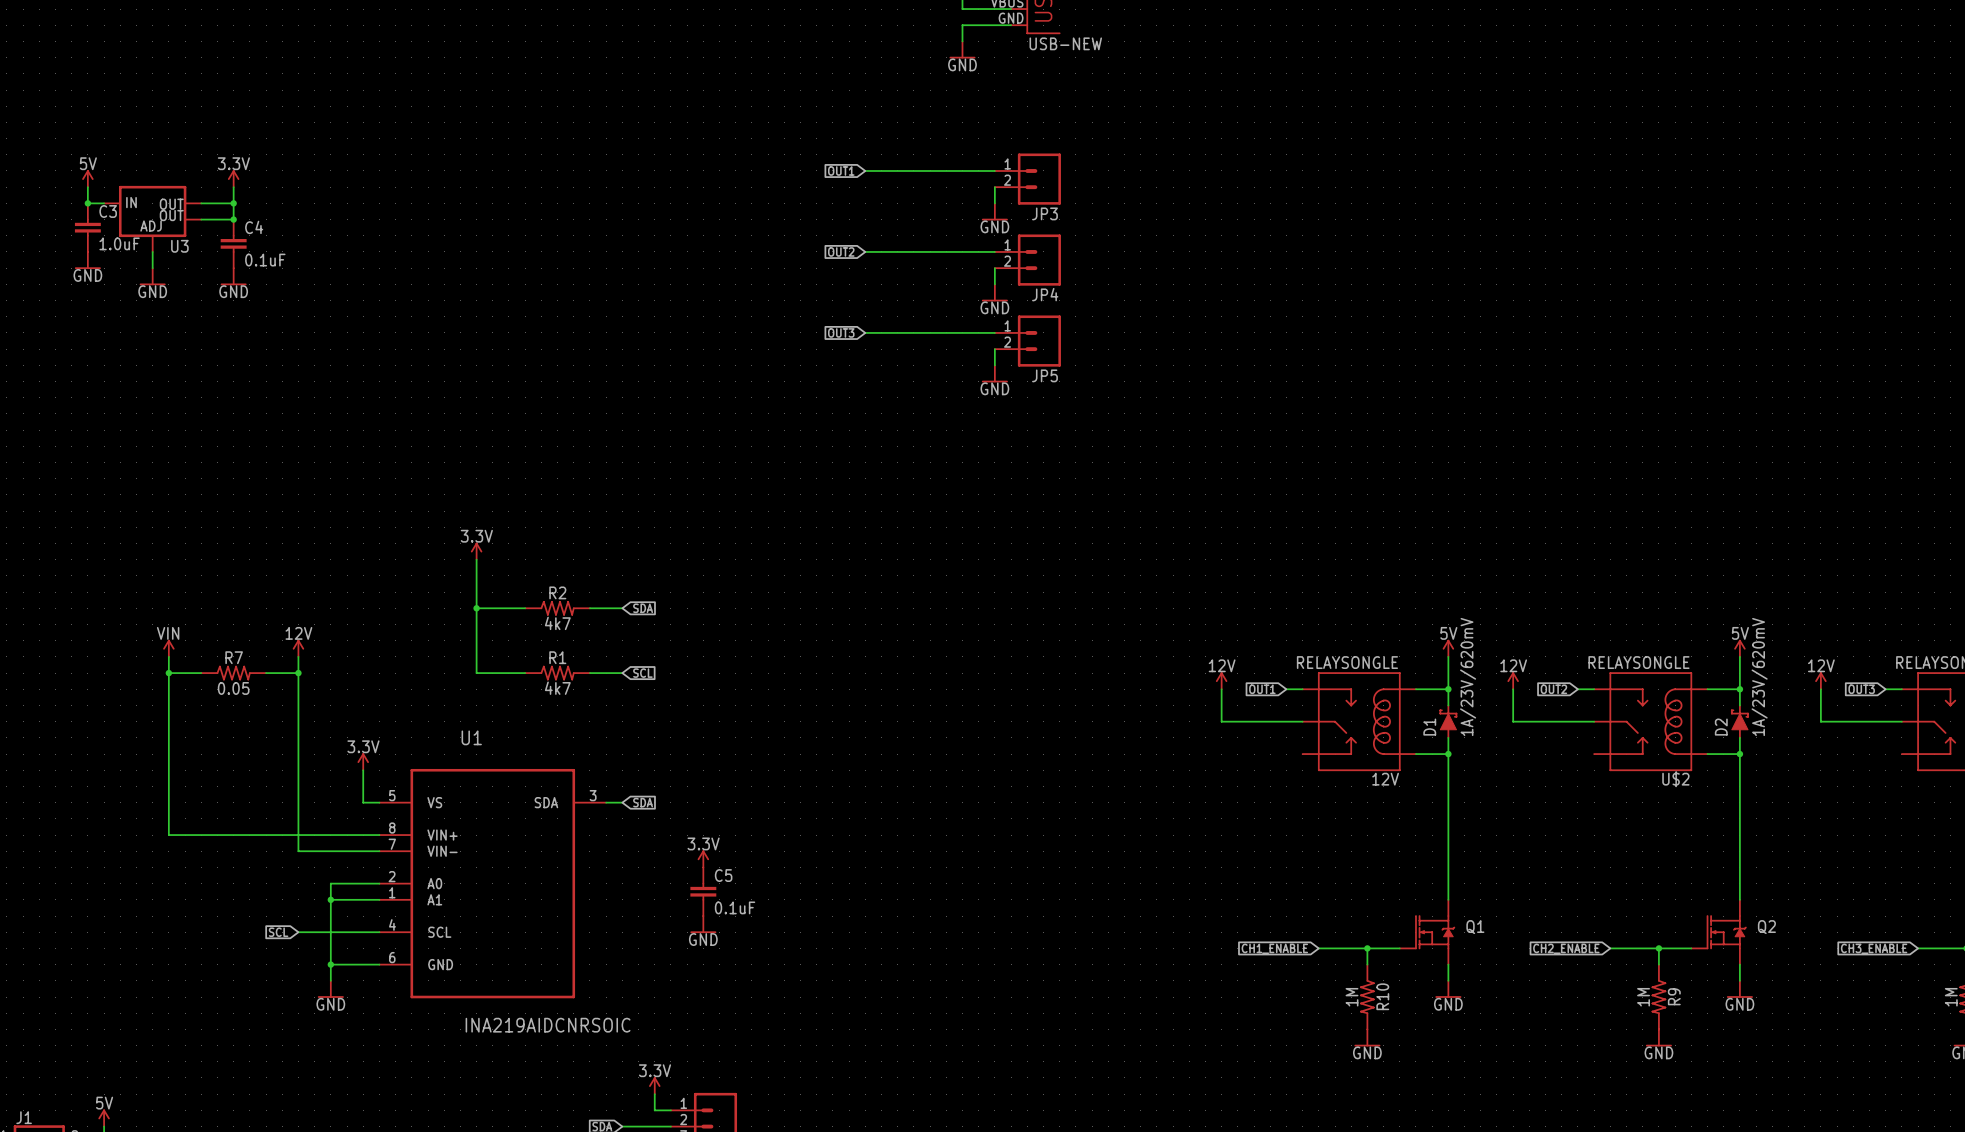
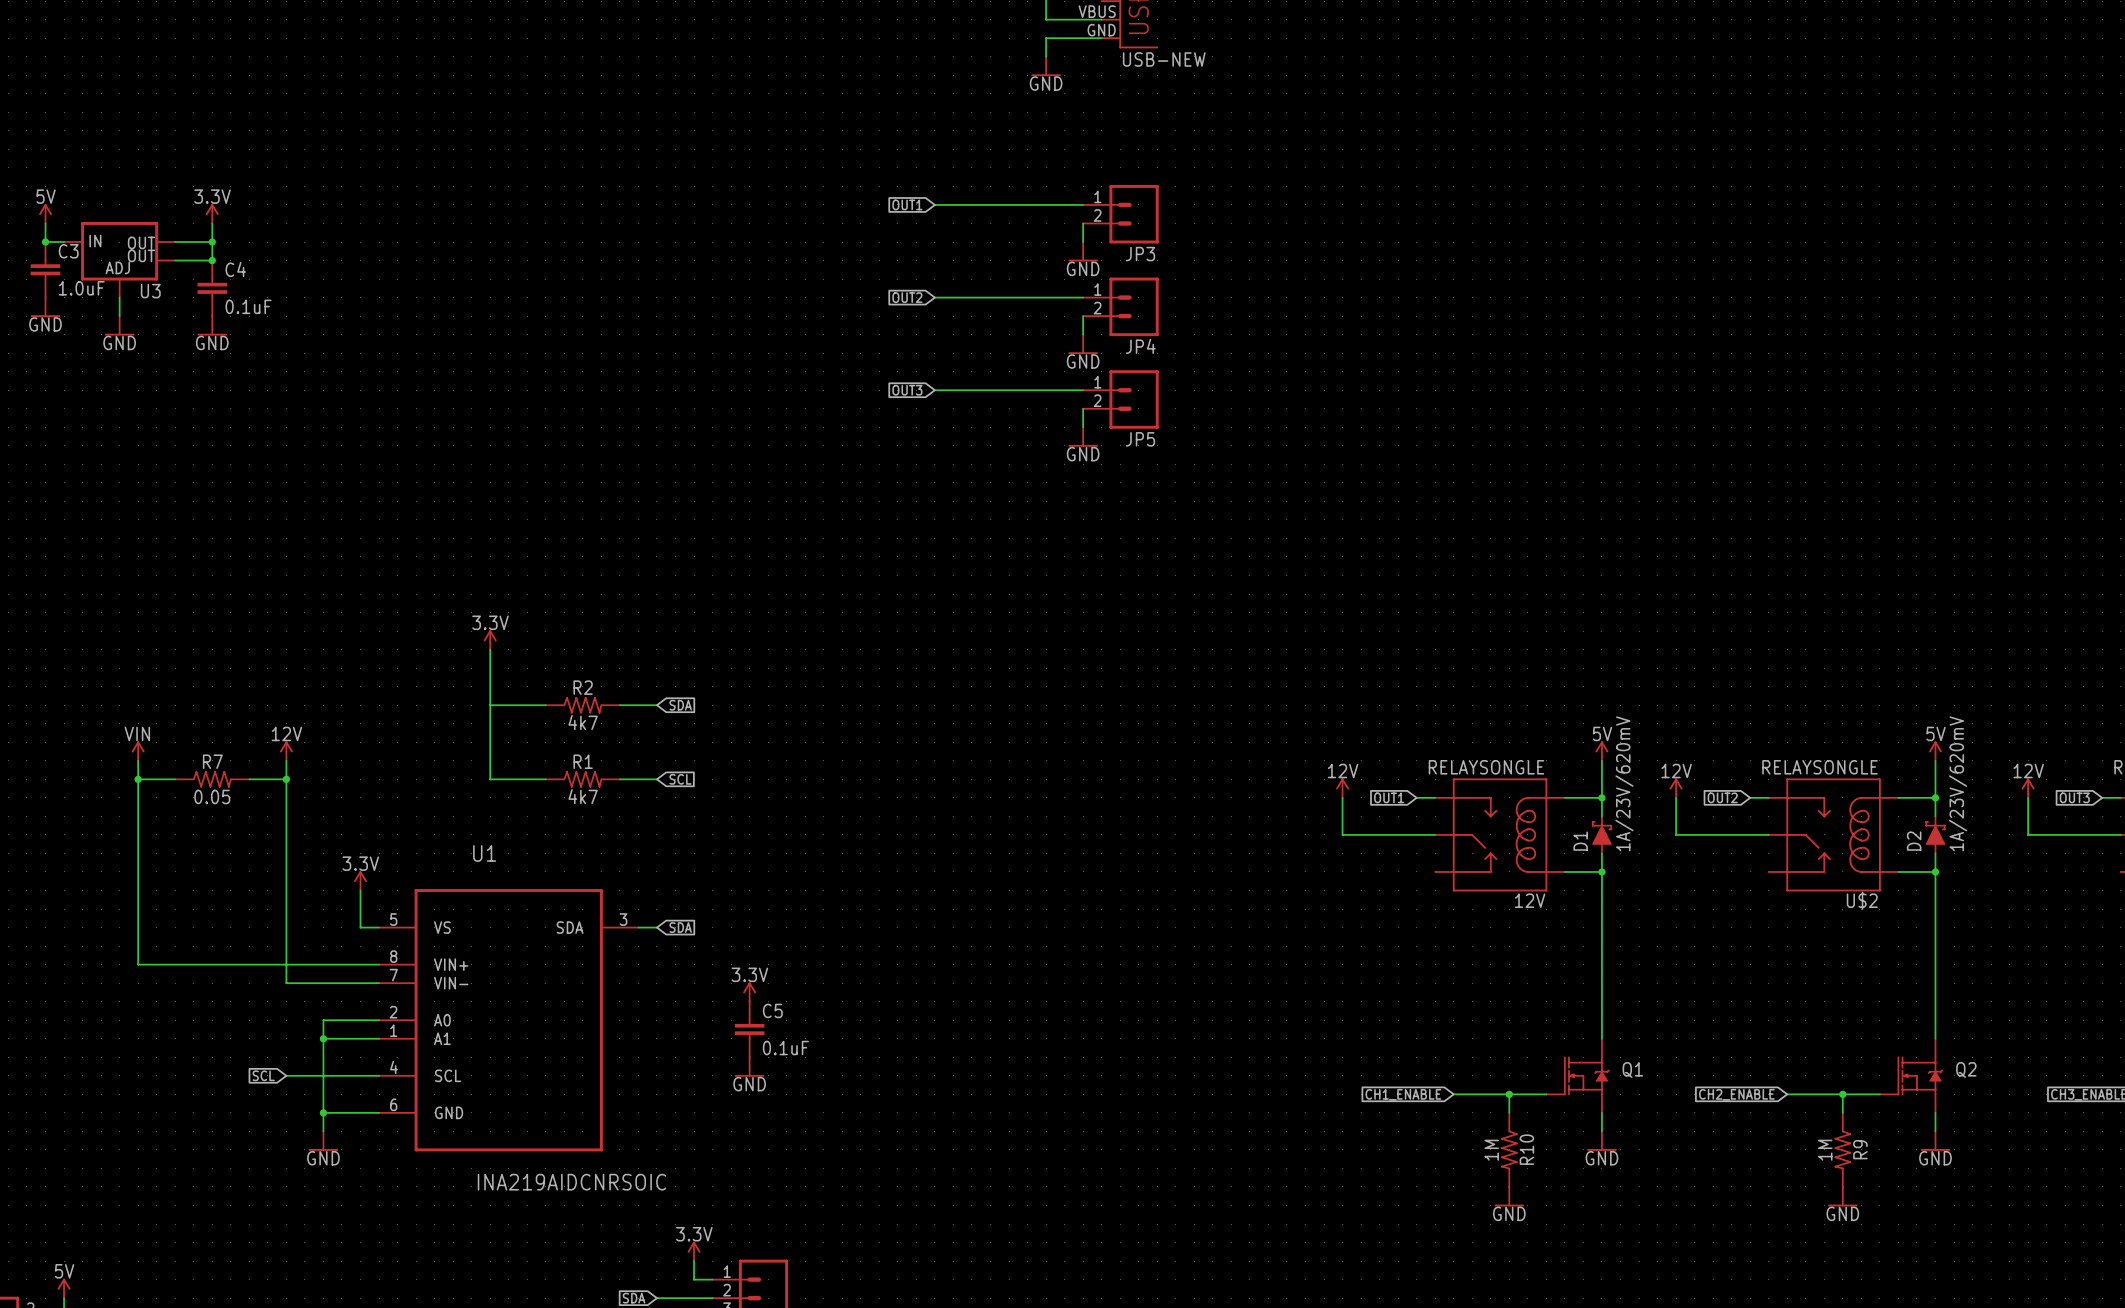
junction: (476, 608) -> none

